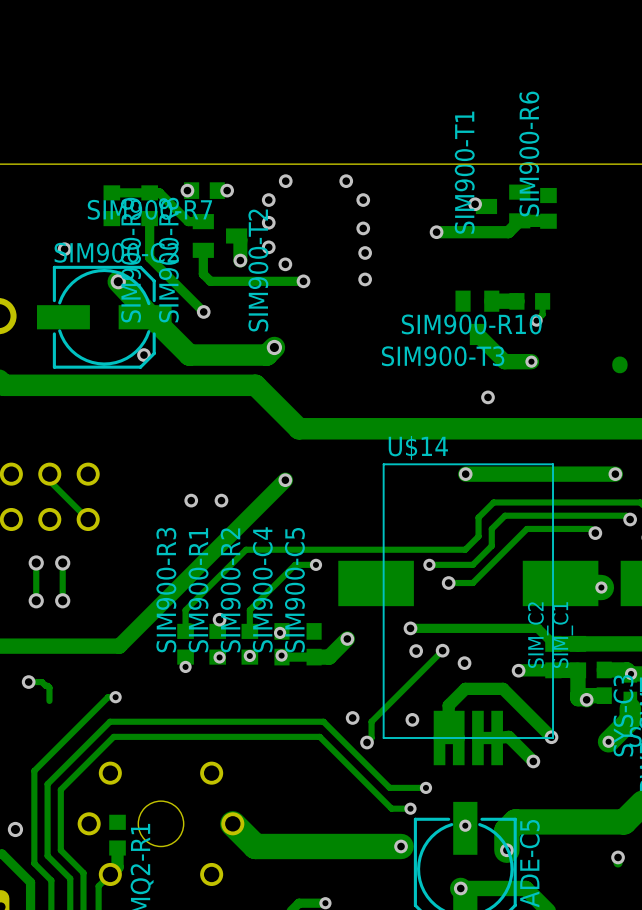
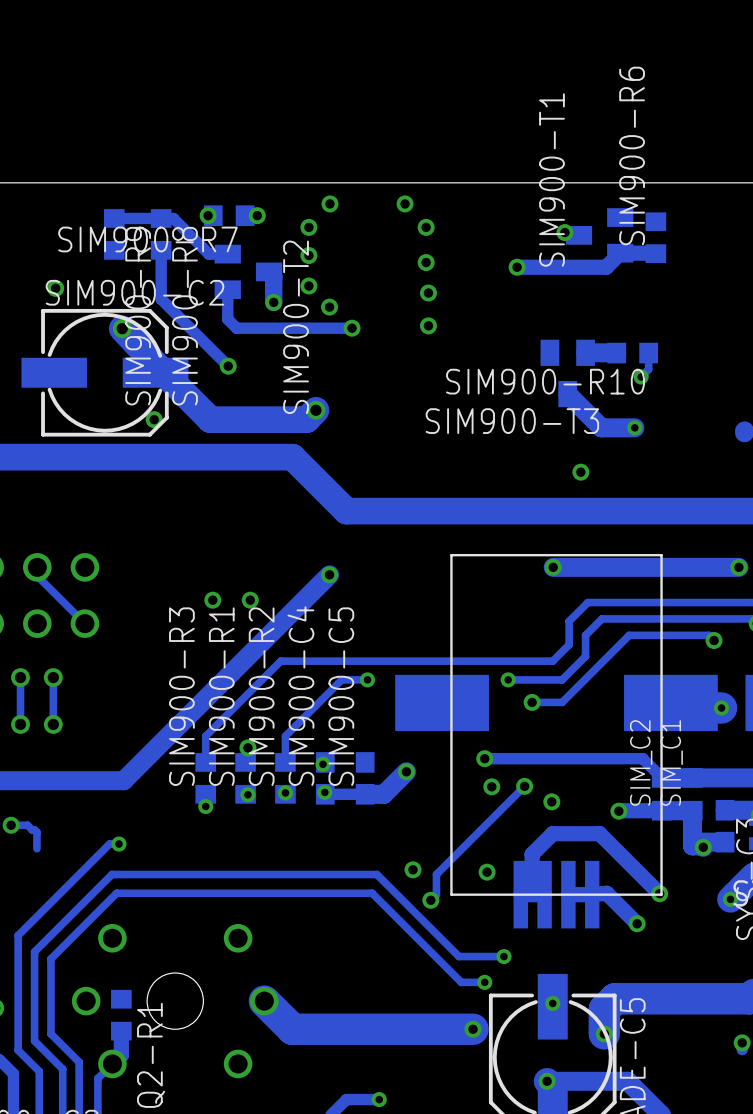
U$14 name: U$14 (418, 447) -> none

